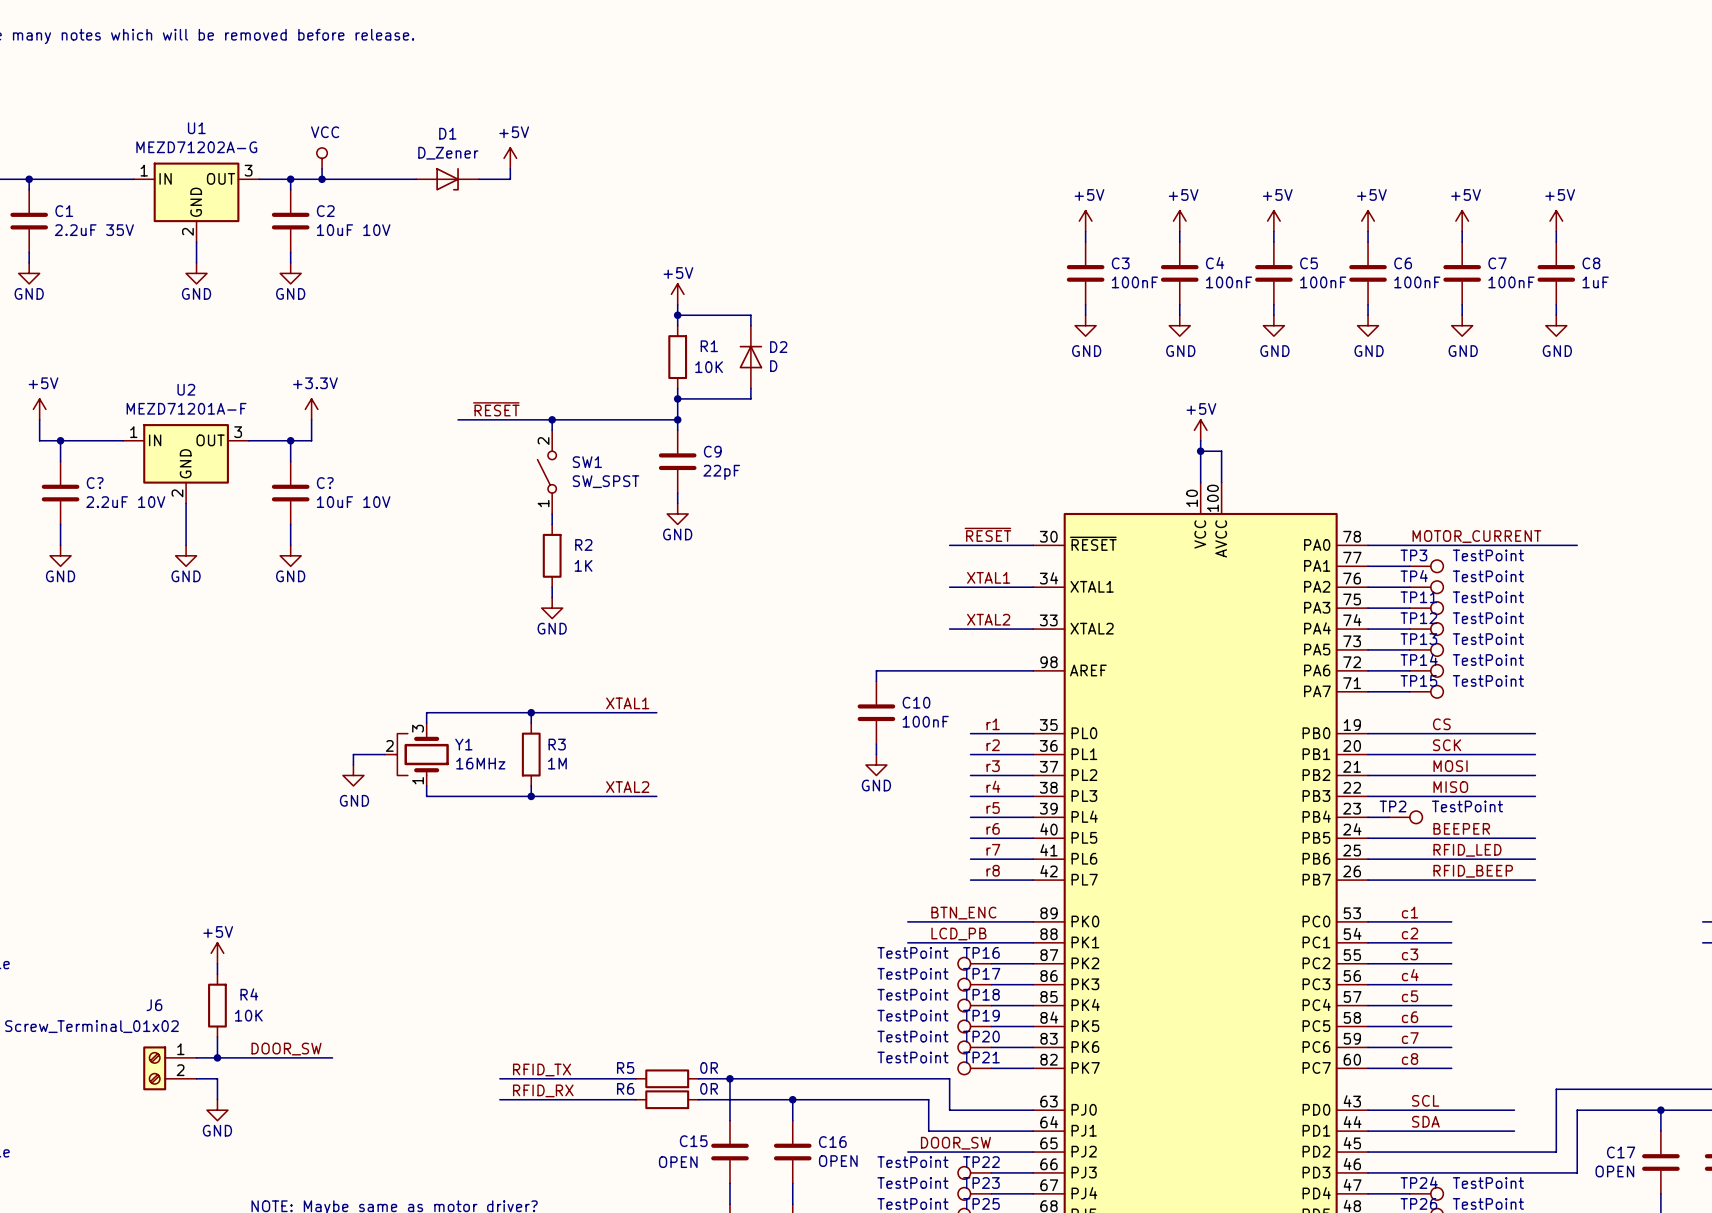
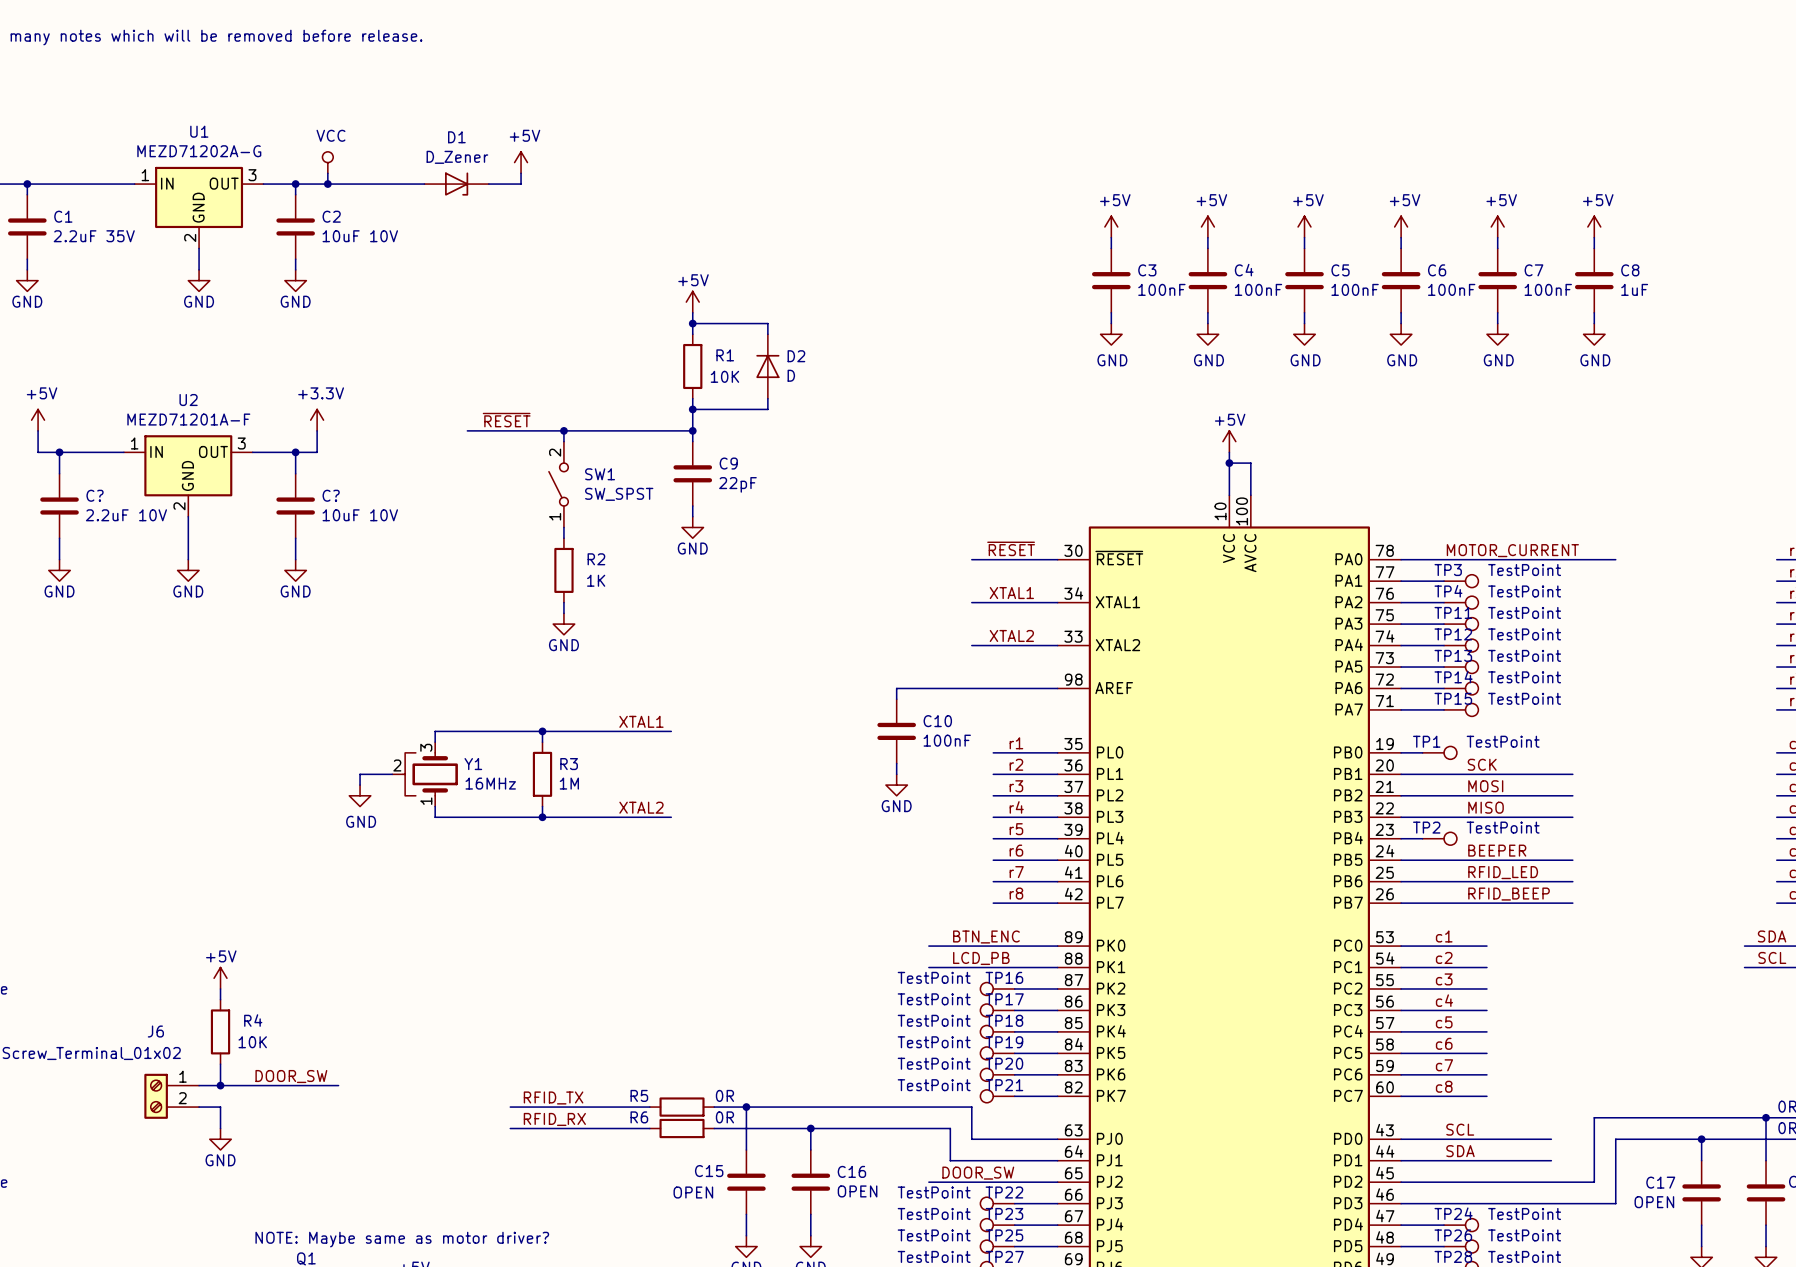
label: CS (1441, 724) -> none
wire: (1388, 733) (1535, 733) -> none
TP1: none -> TestPoint (1439, 752)

